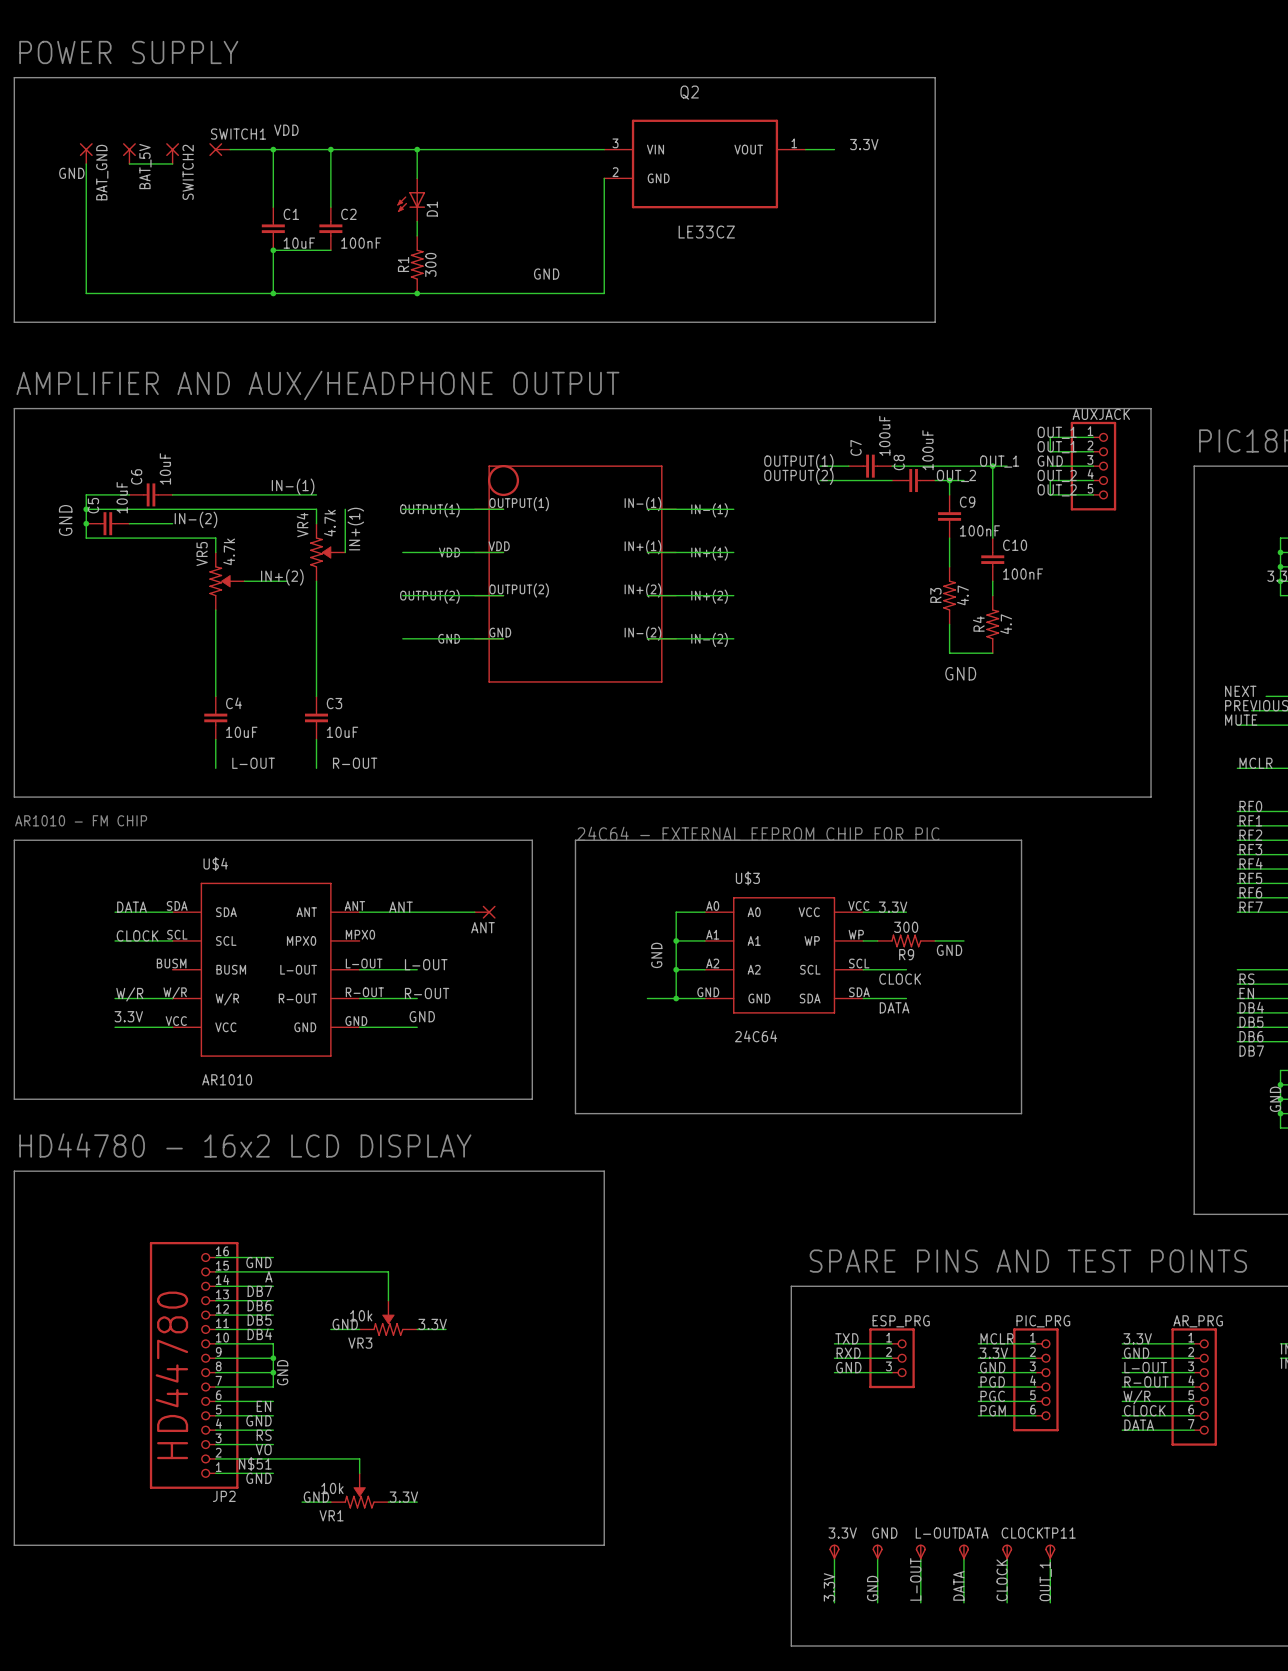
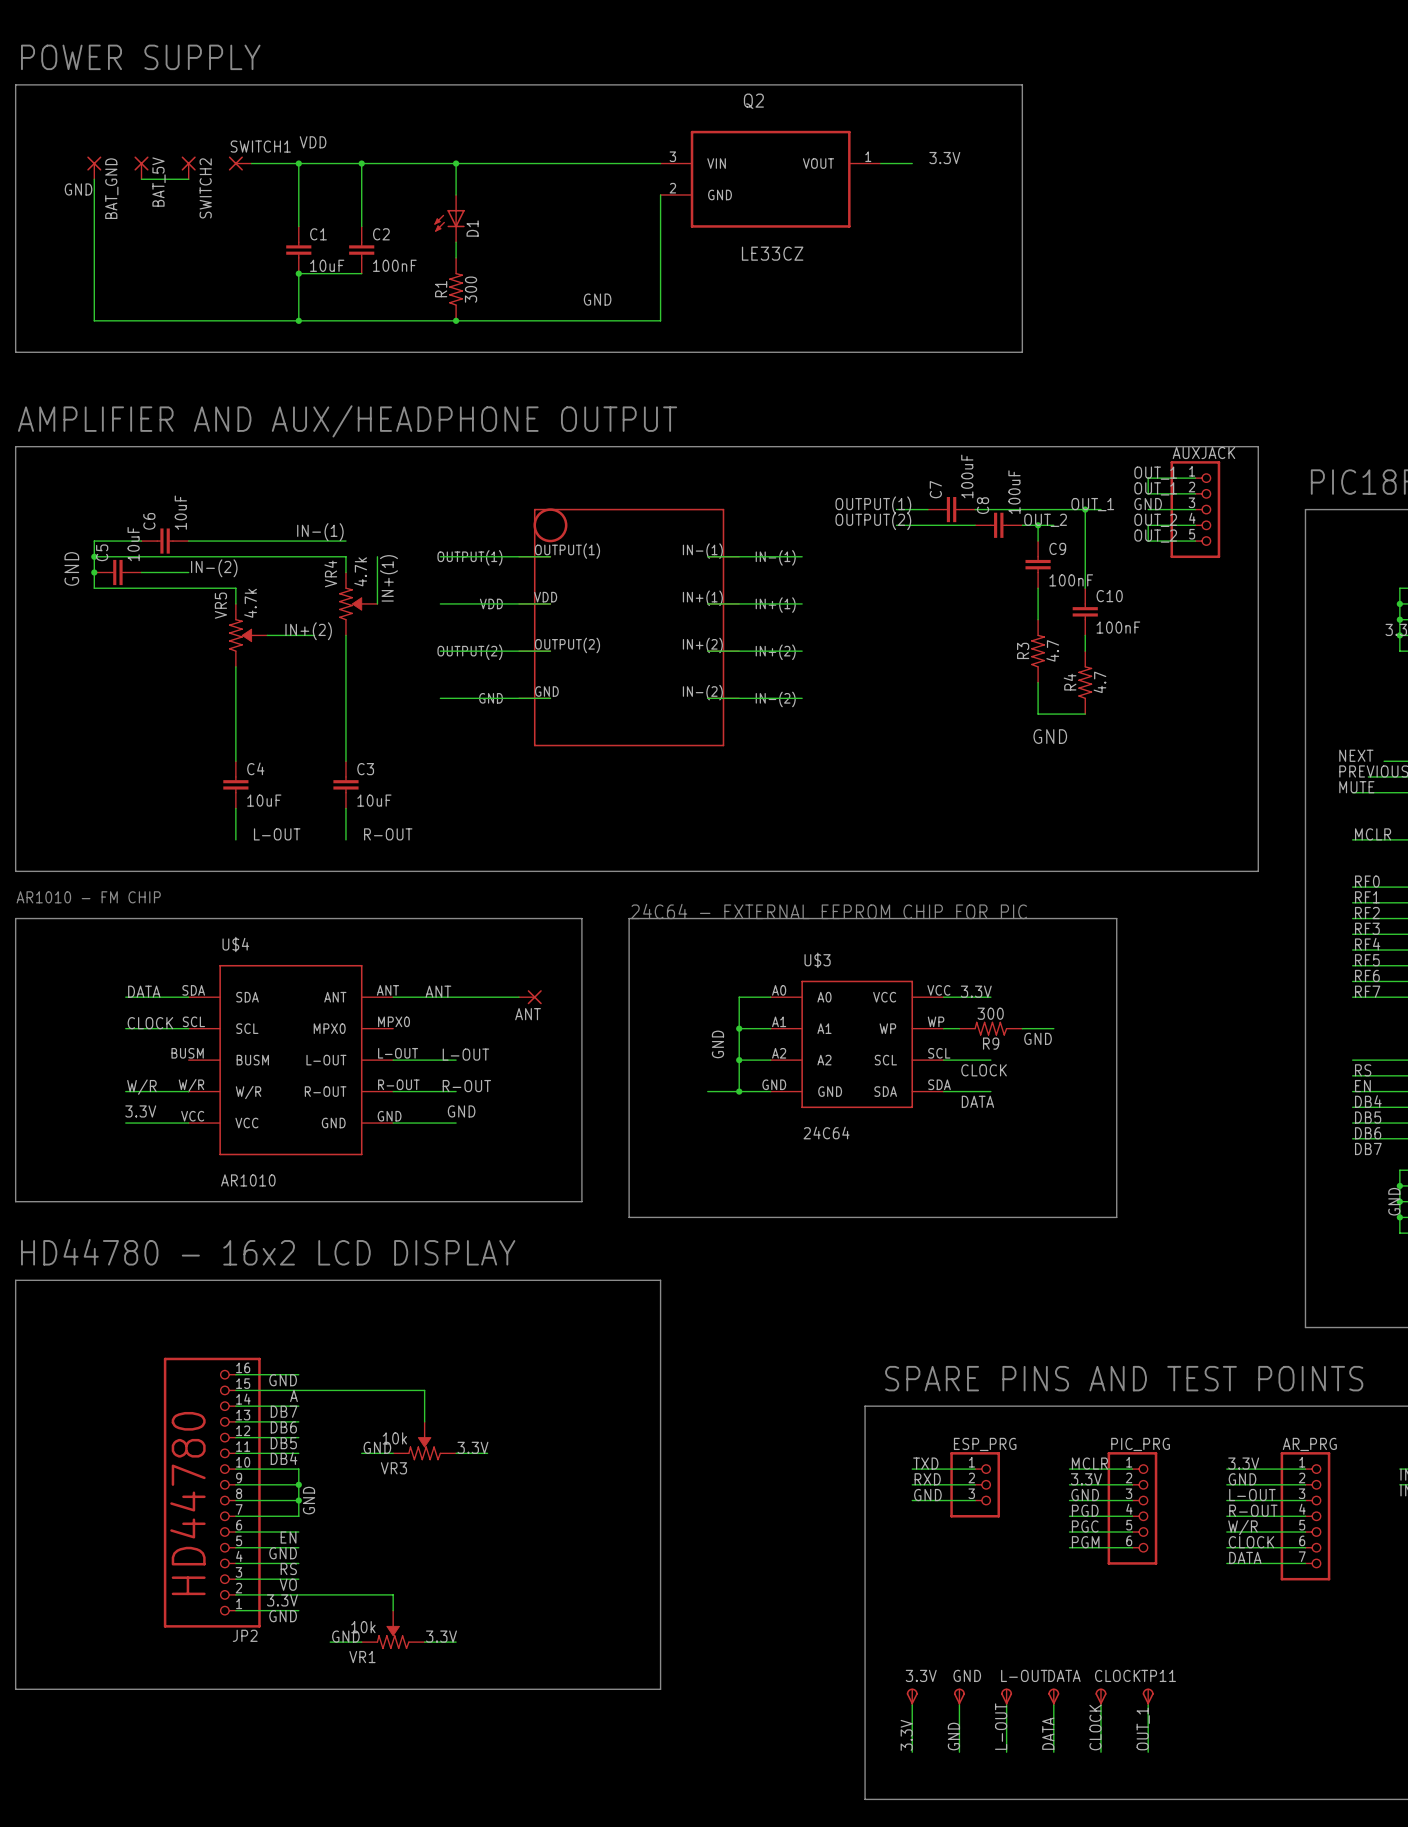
label: N$51 (255, 1463) -> 3.3V (282, 1600)

